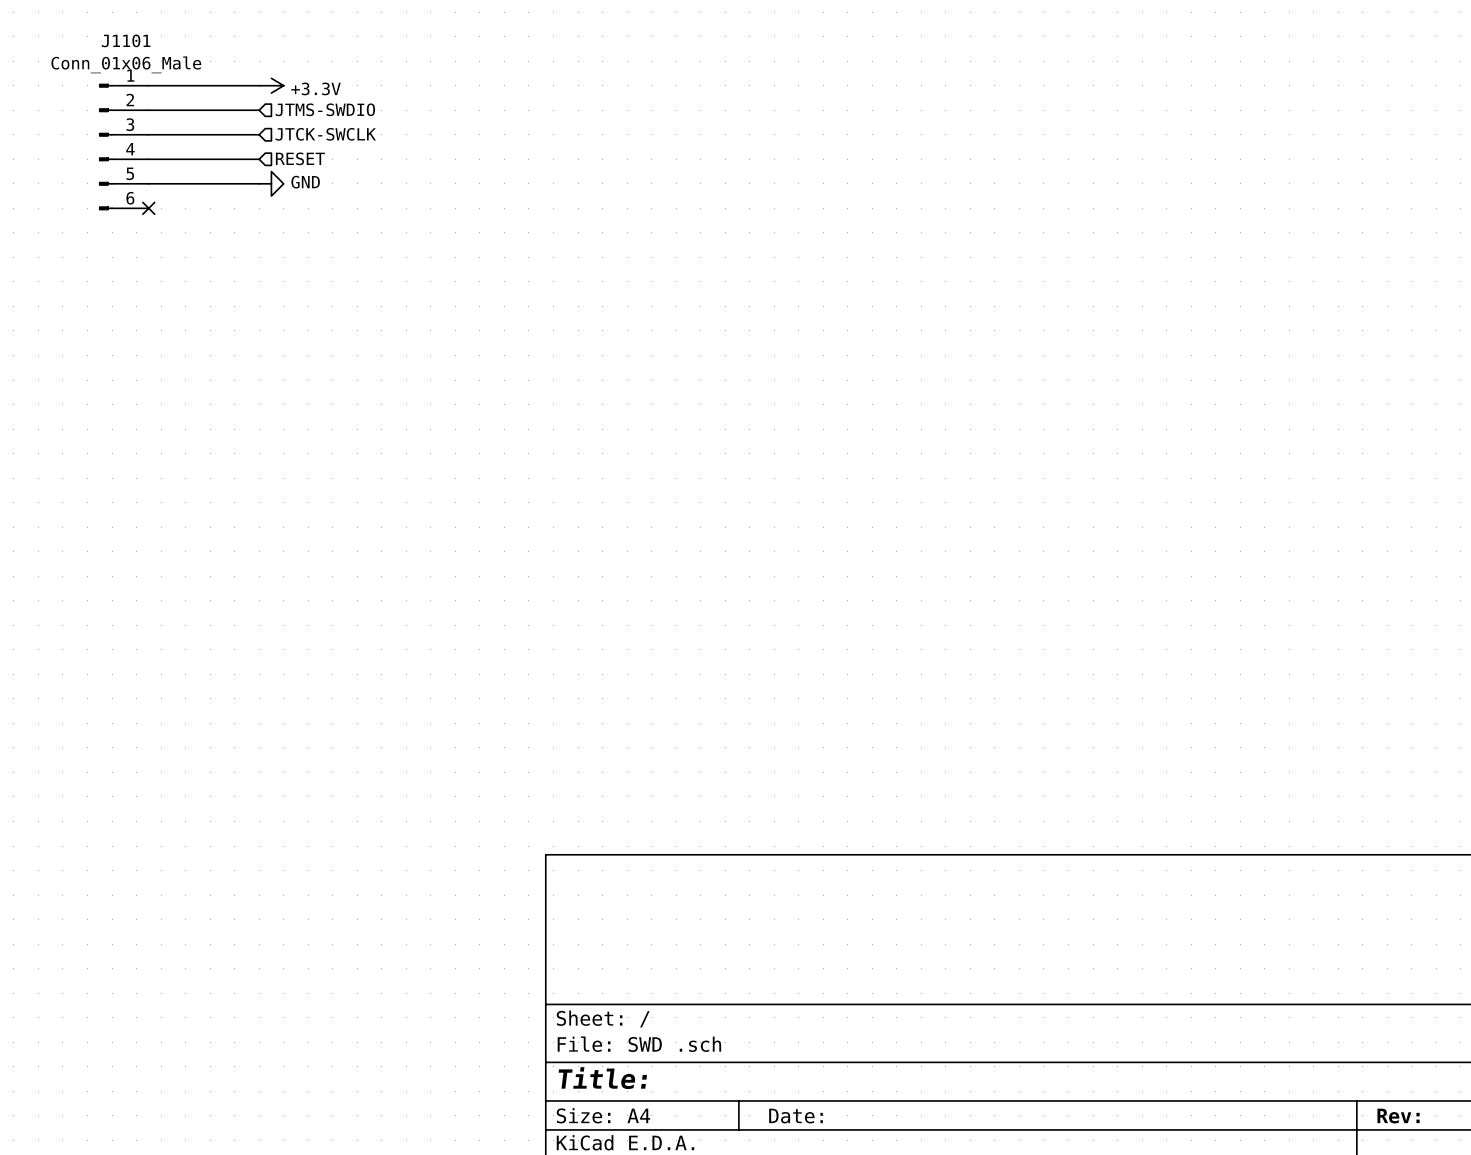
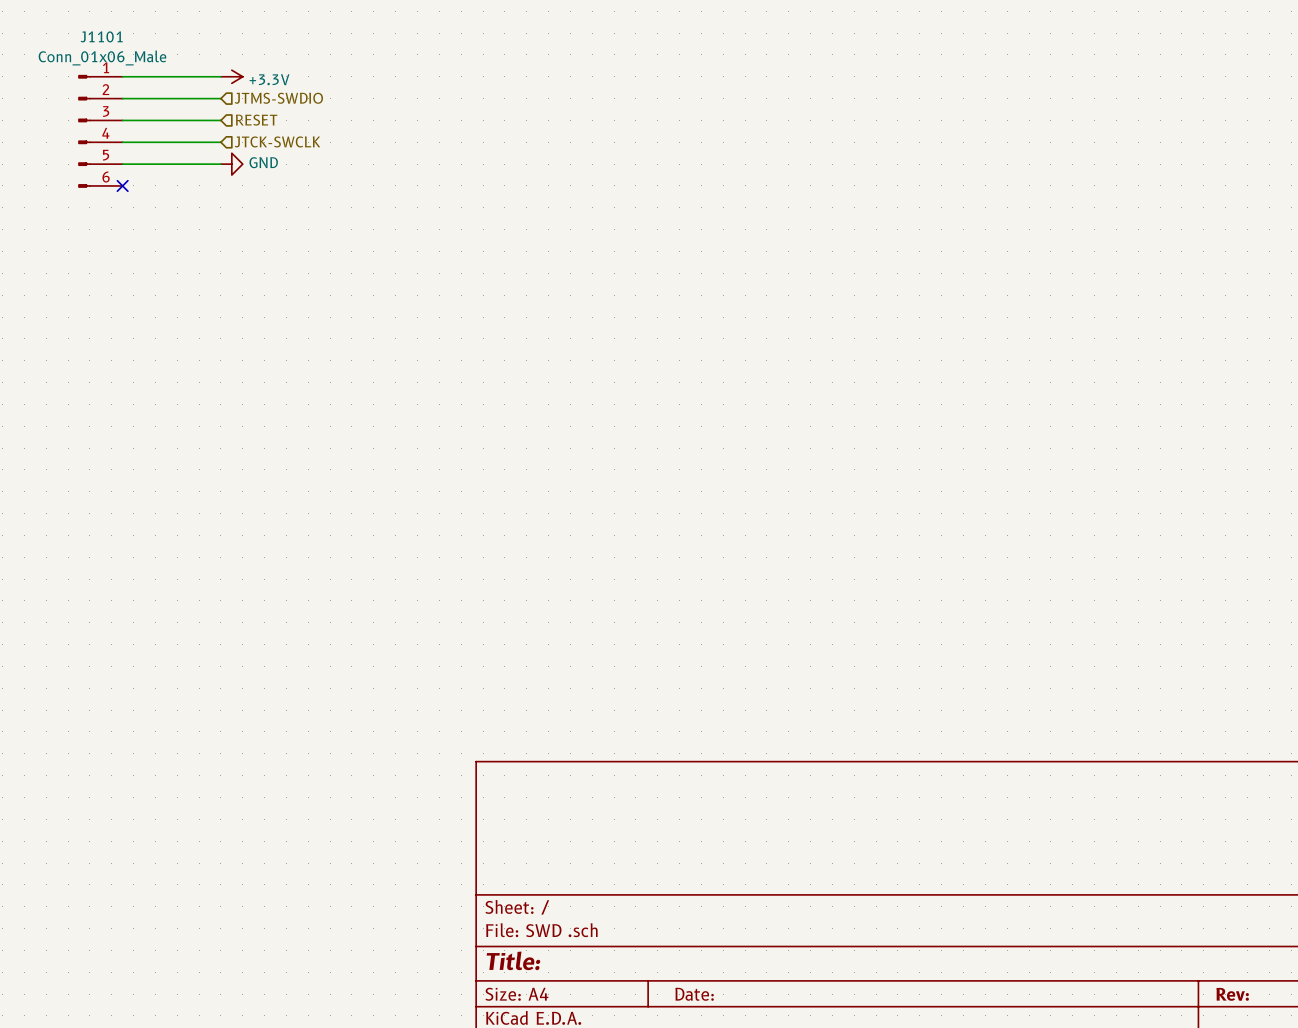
hierarchical label: JTCK-SWCLK (325, 134) -> RESET (256, 120)
hierarchical label: RESET (300, 158) -> JTCK-SWCLK (277, 141)

